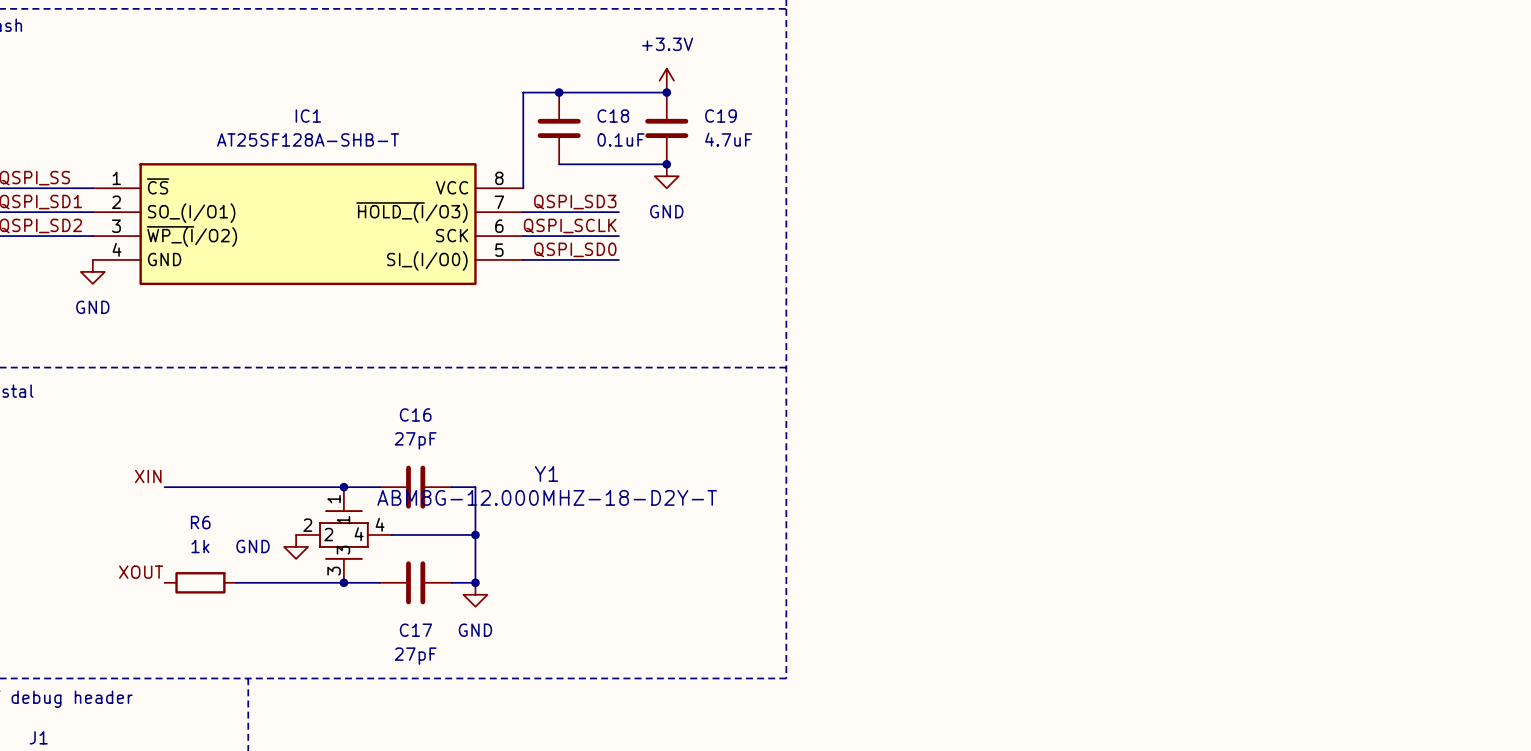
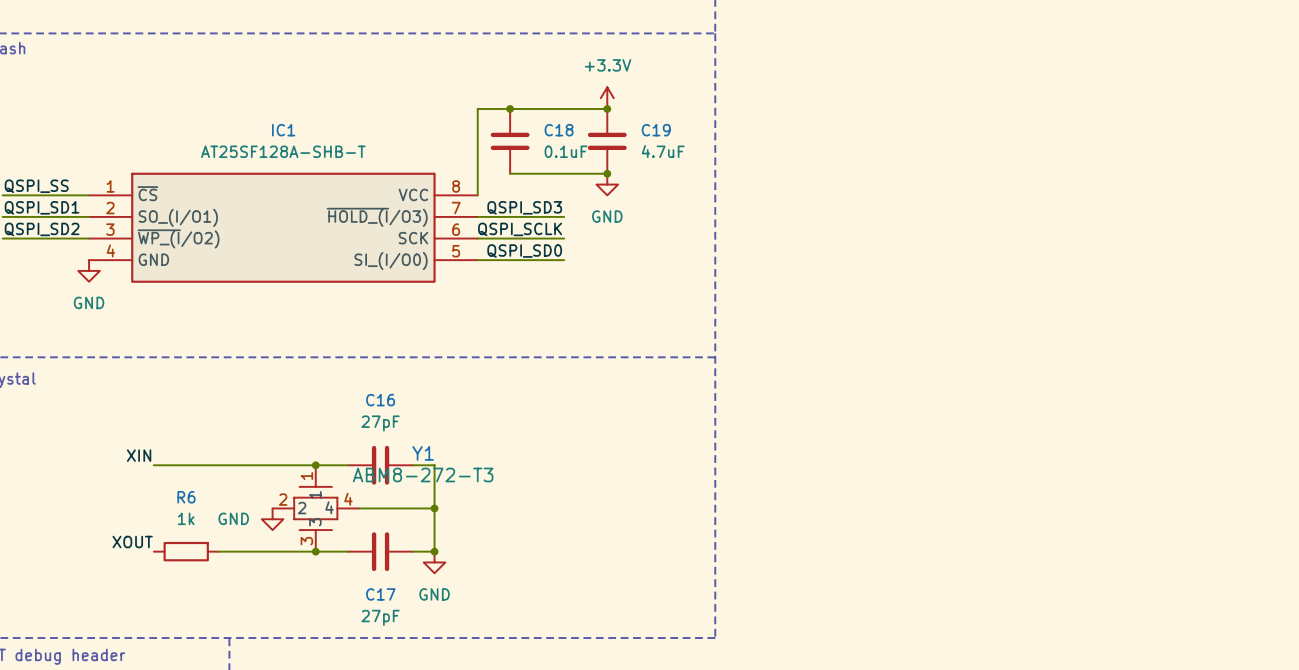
Y1 name position: Y1 (546, 474) -> Y1 (423, 453)
Y1 value: ABM8G-12.000MHZ-18-D2Y-T (547, 497) -> ABM8-272-T3 (423, 474)

